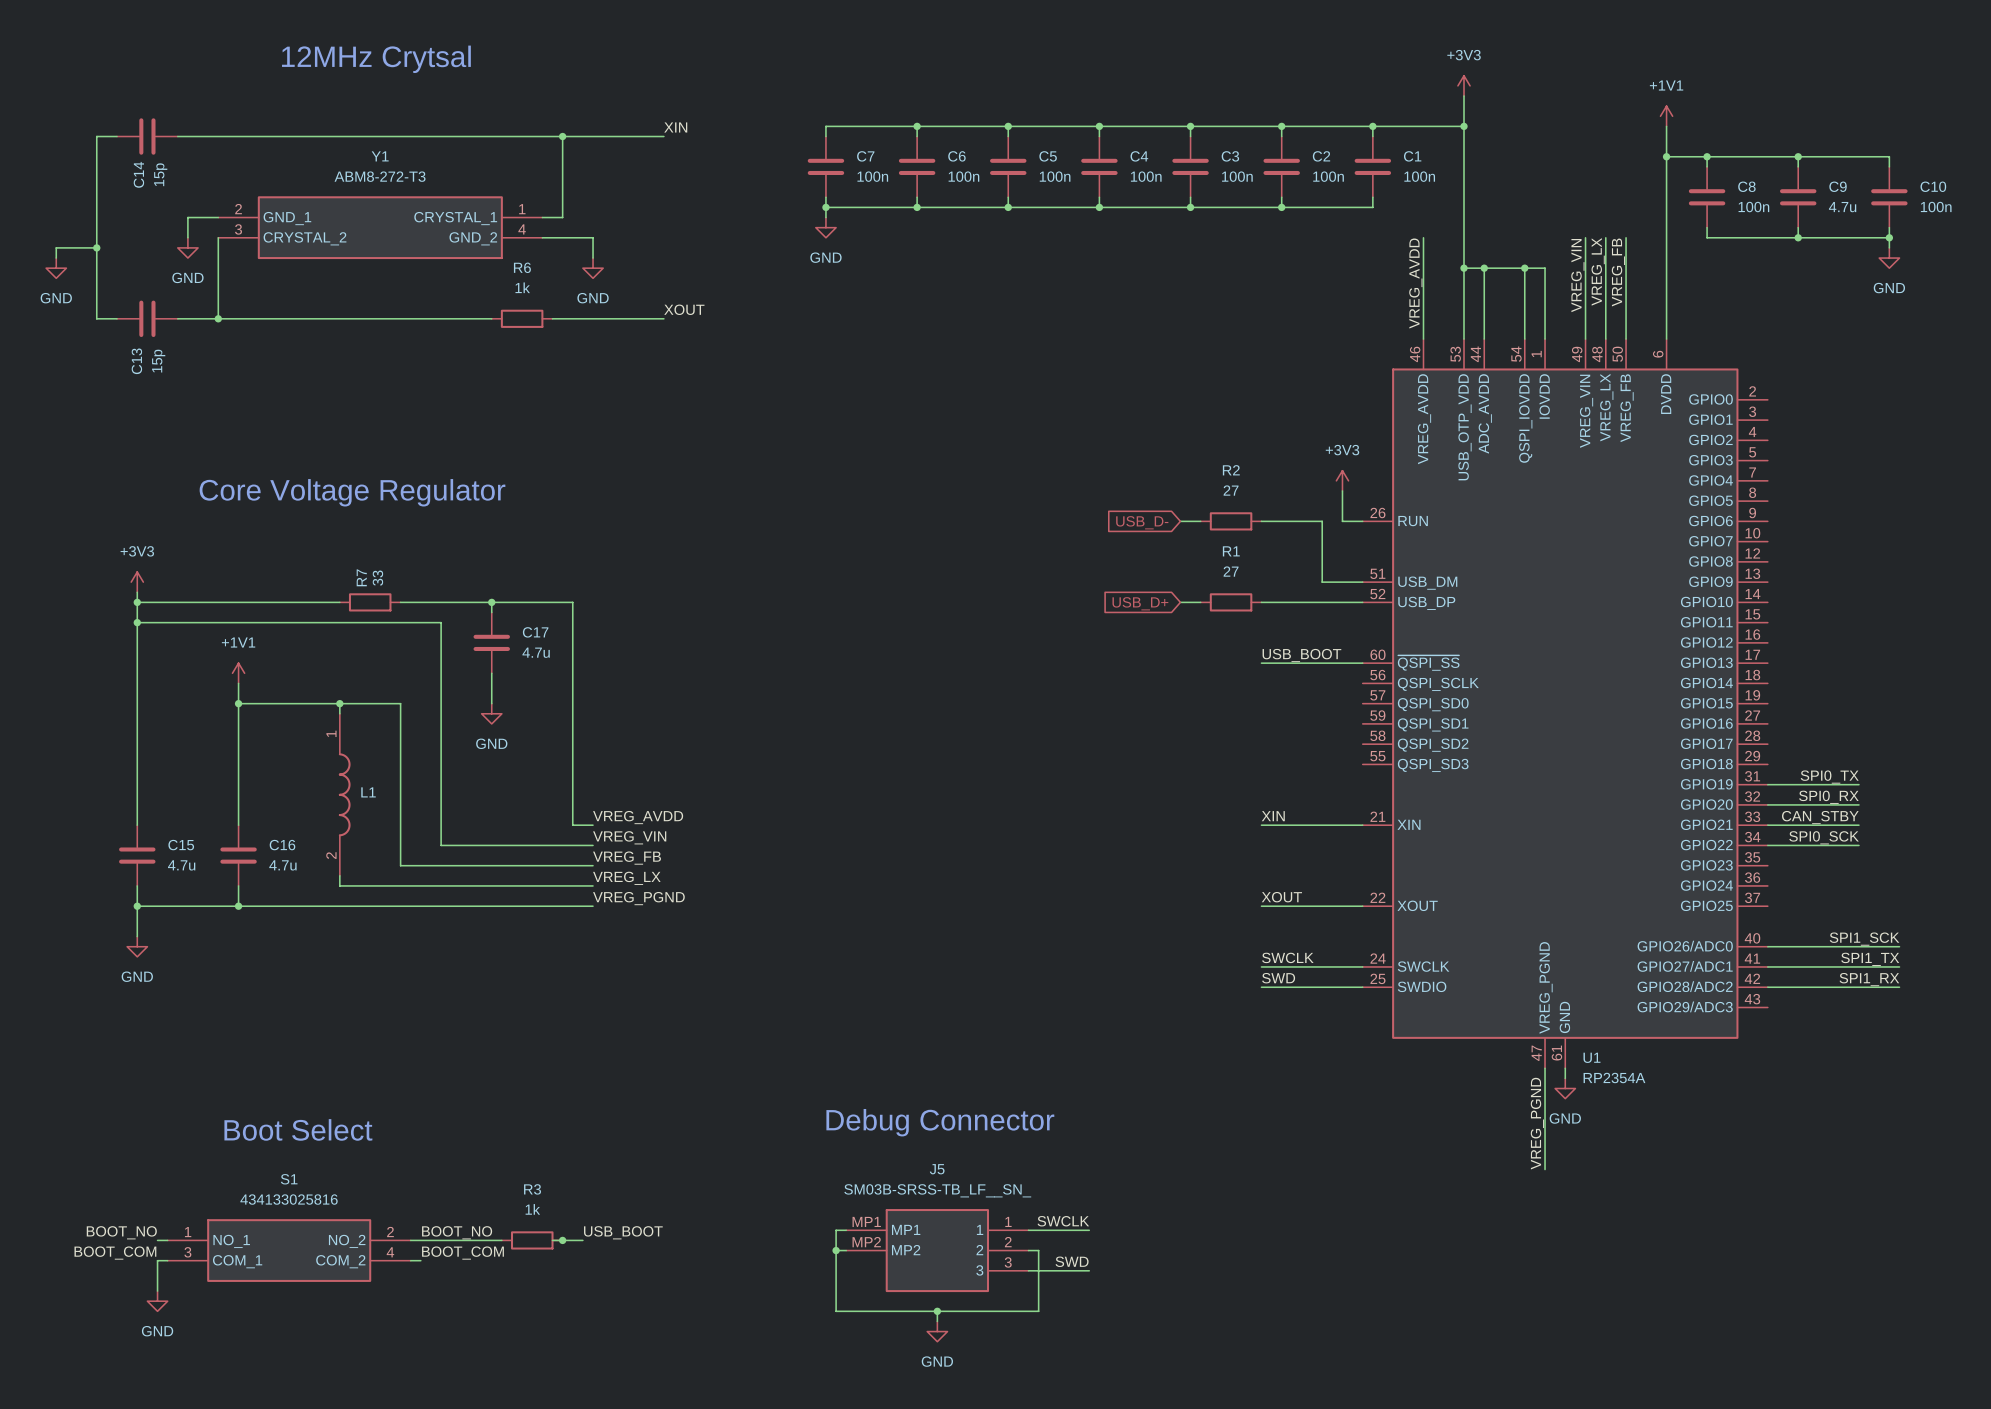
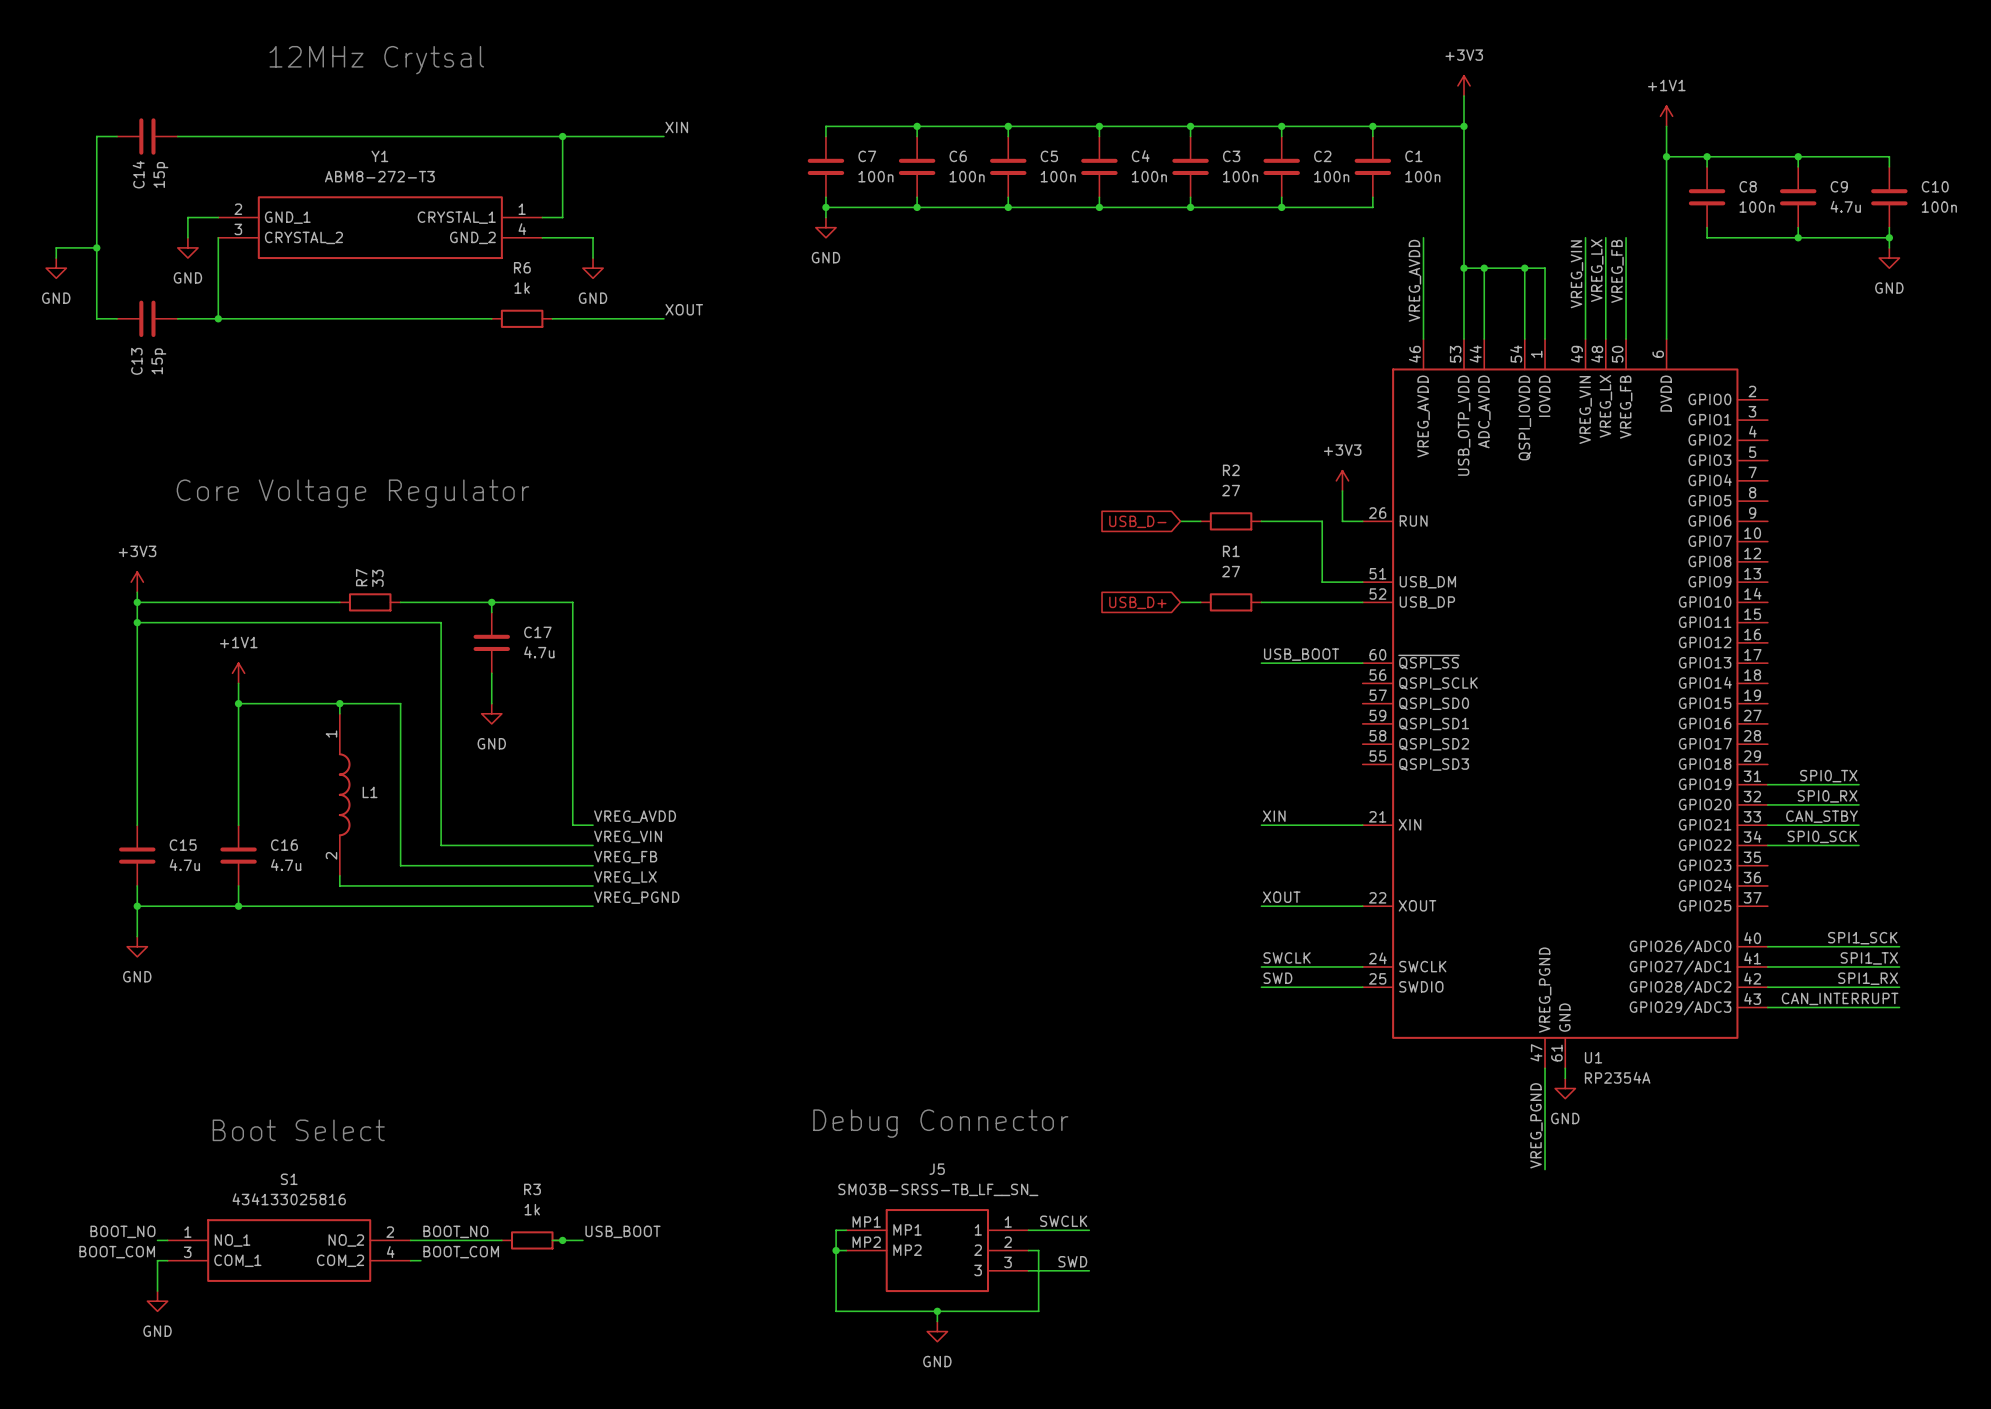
label: none -> CAN_INTERRUPT (1840, 998)
wire: none -> (1767, 1007) (1899, 1007)

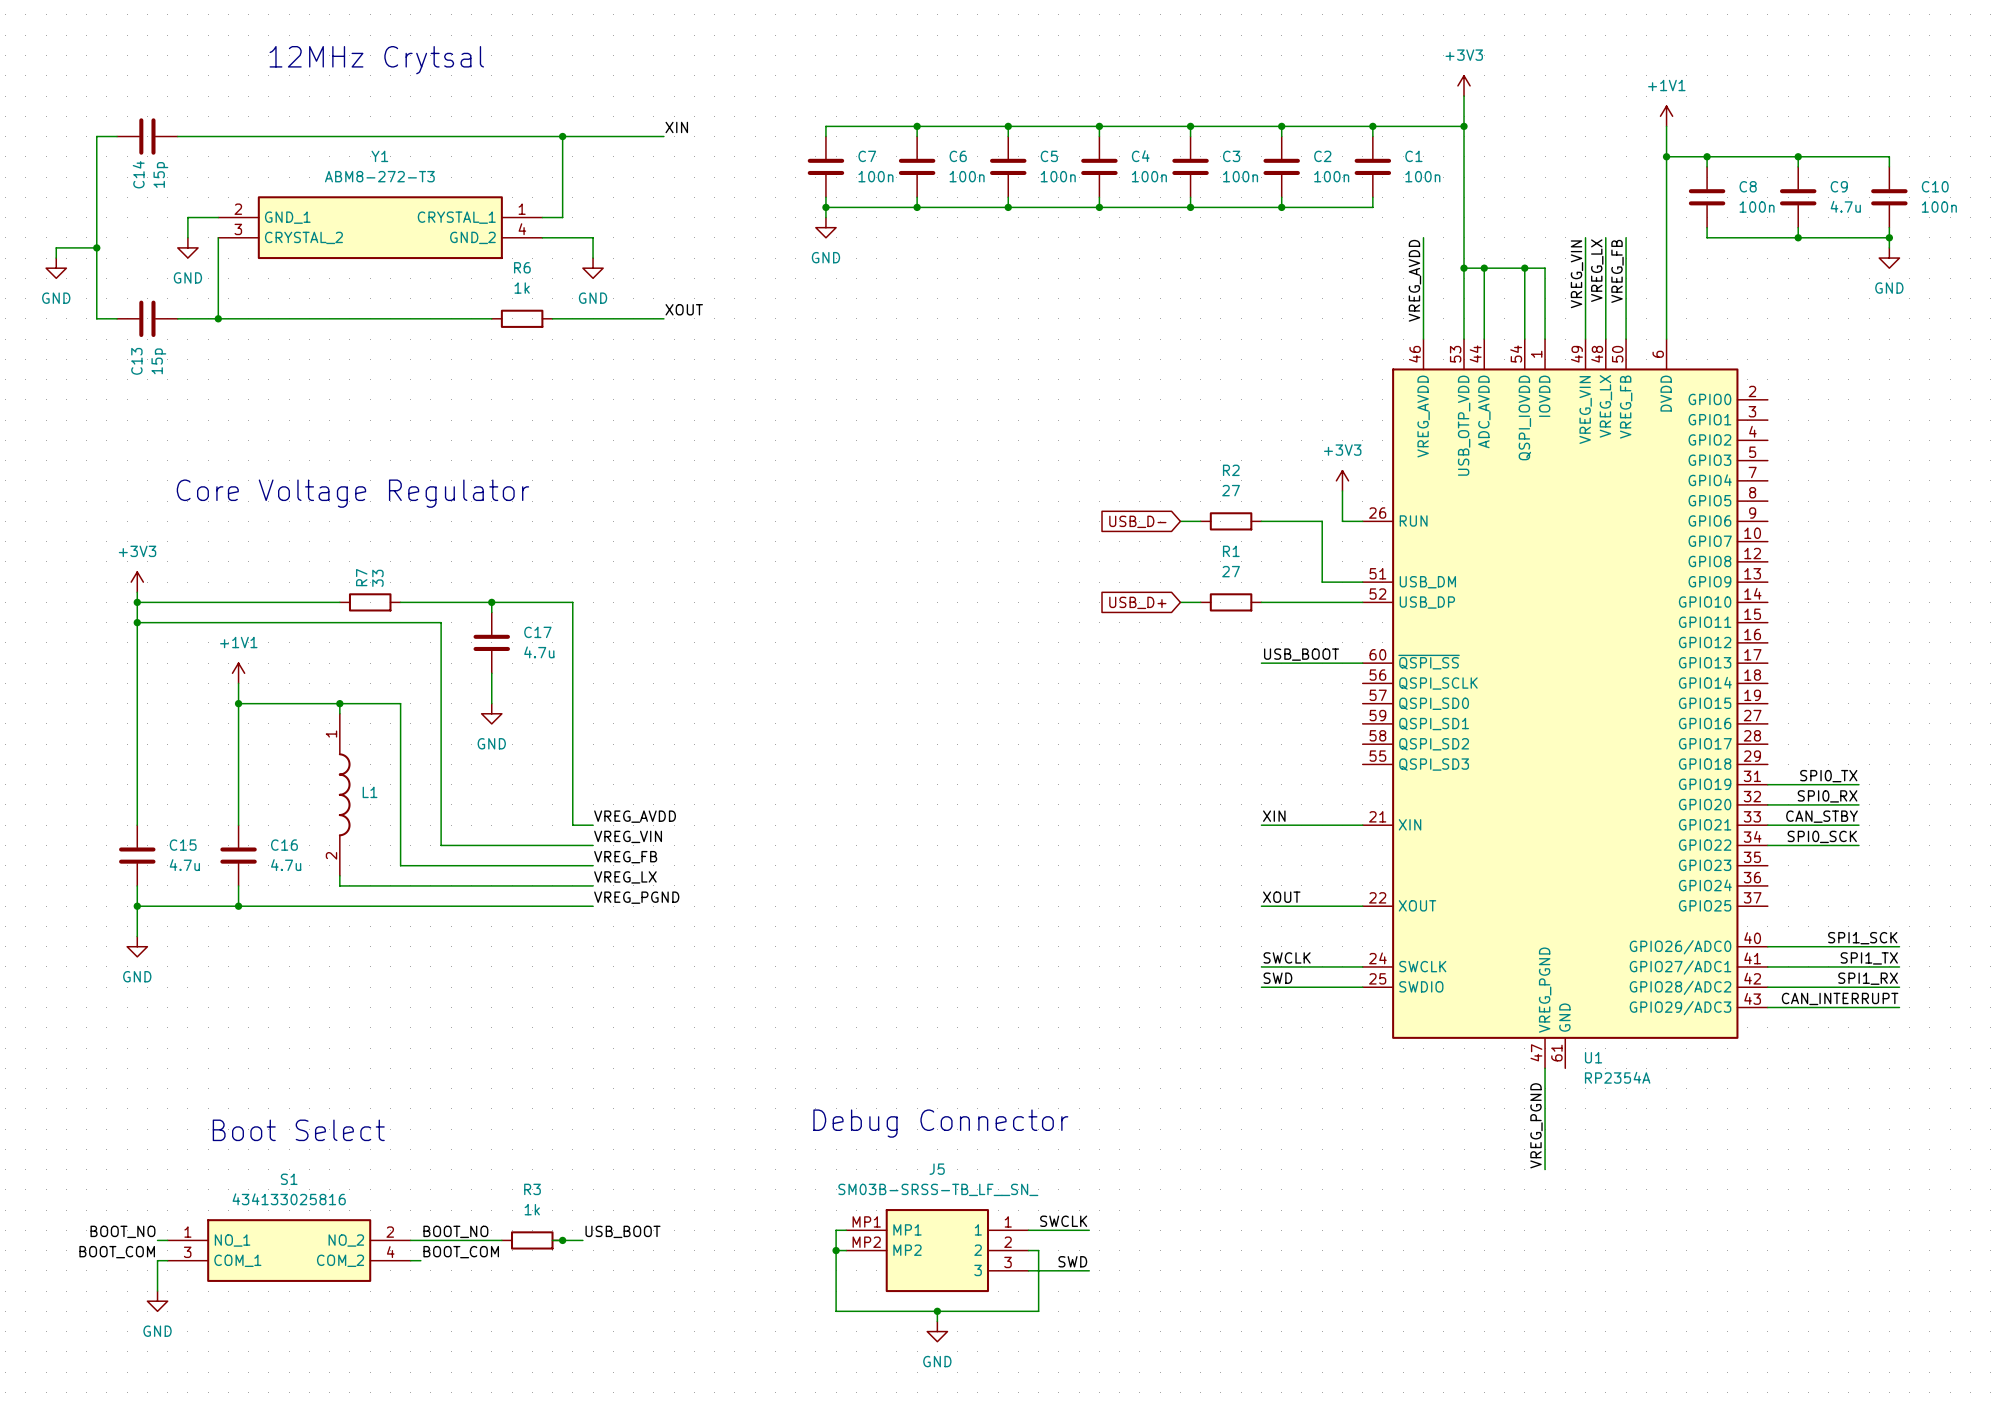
wire: (1565, 1068) (1565, 1078) -> none
power symbol: GND (1565, 1088) -> none

